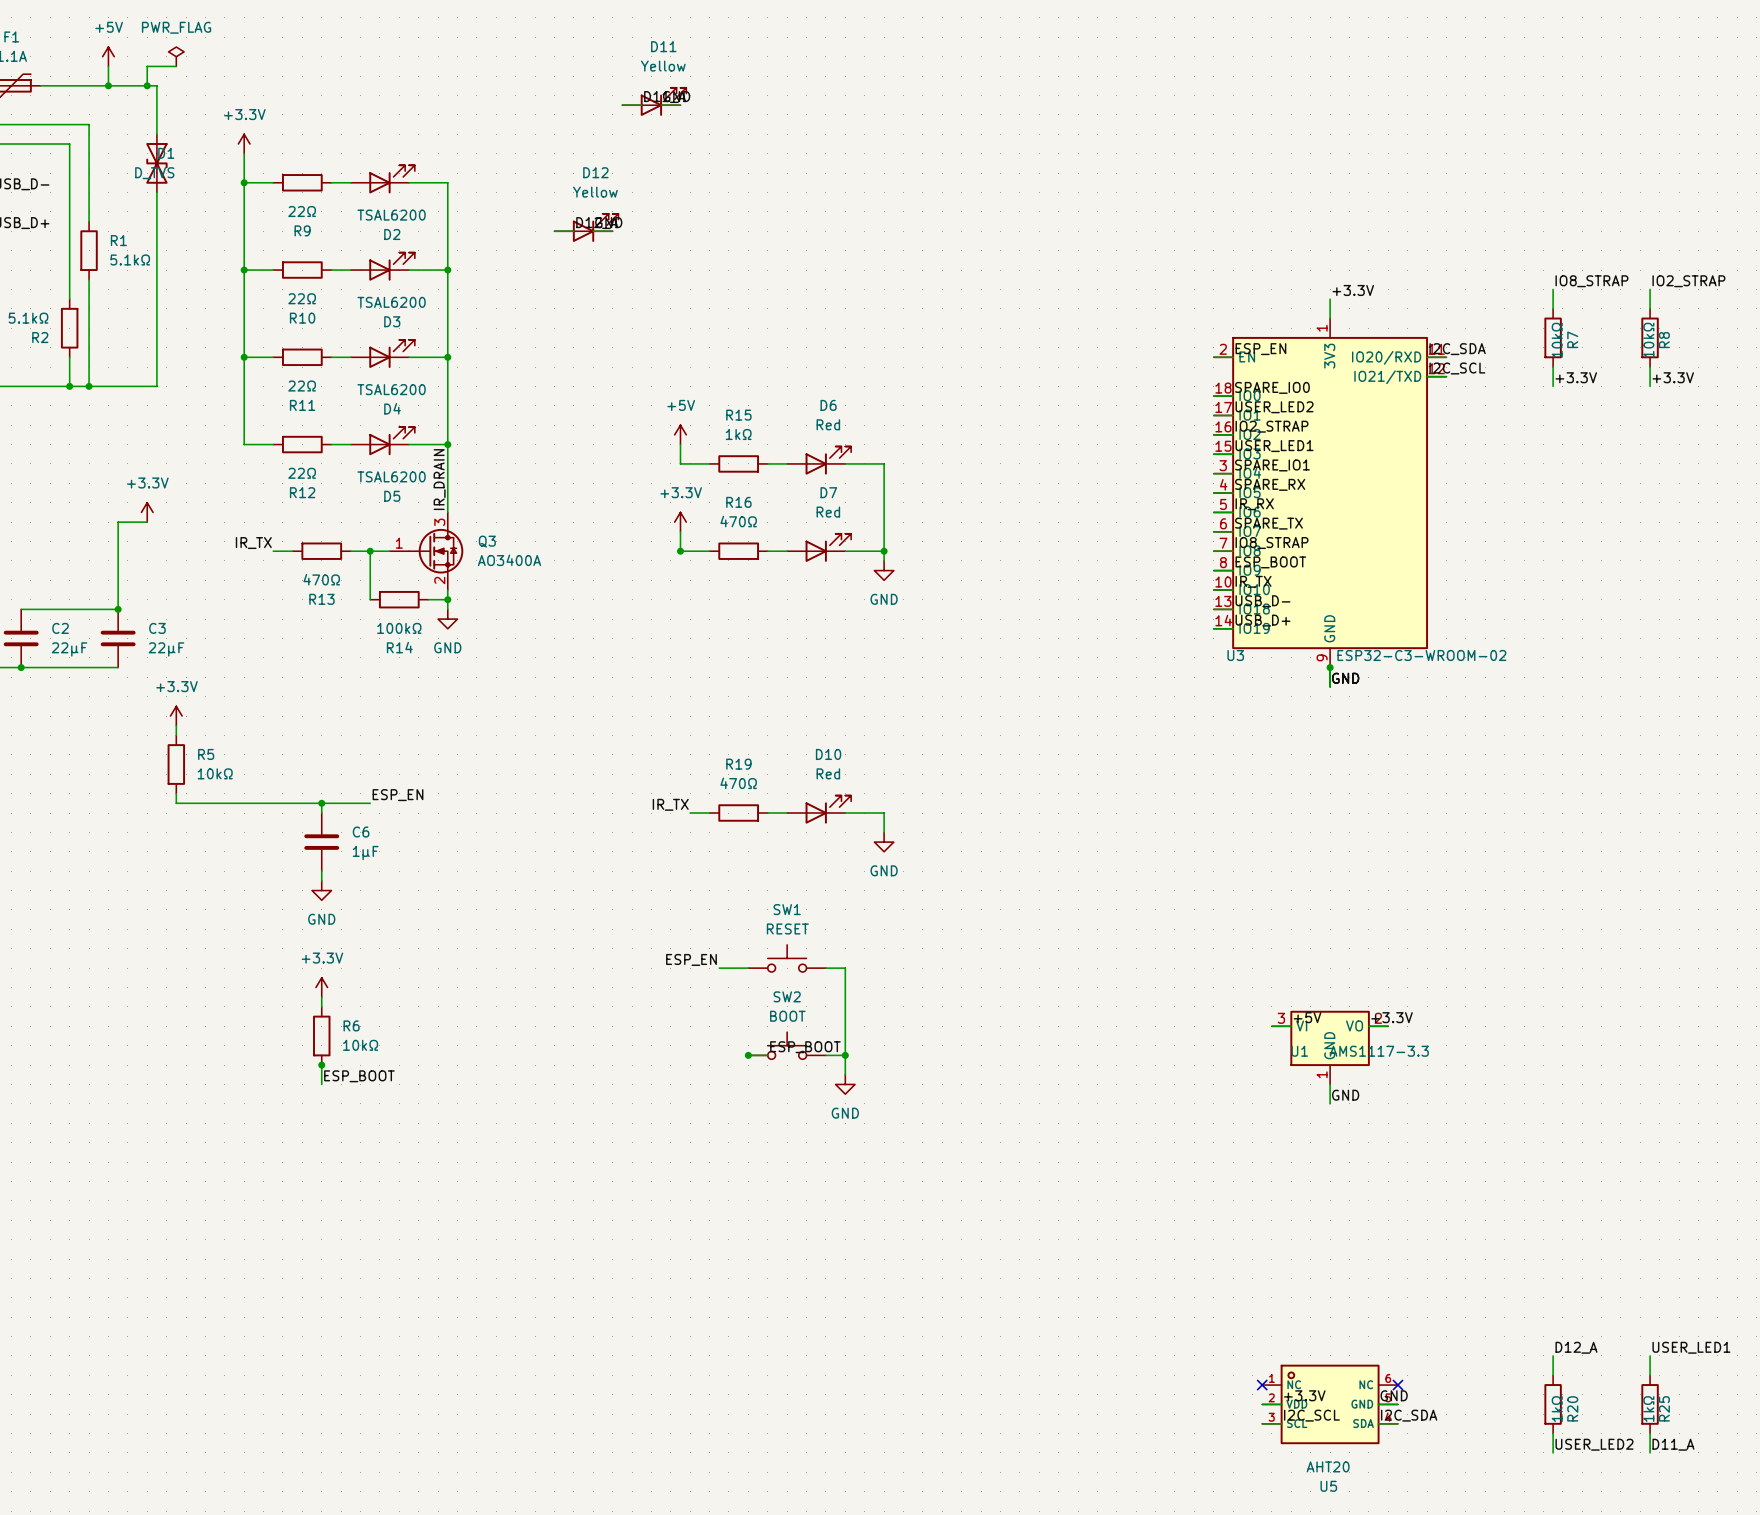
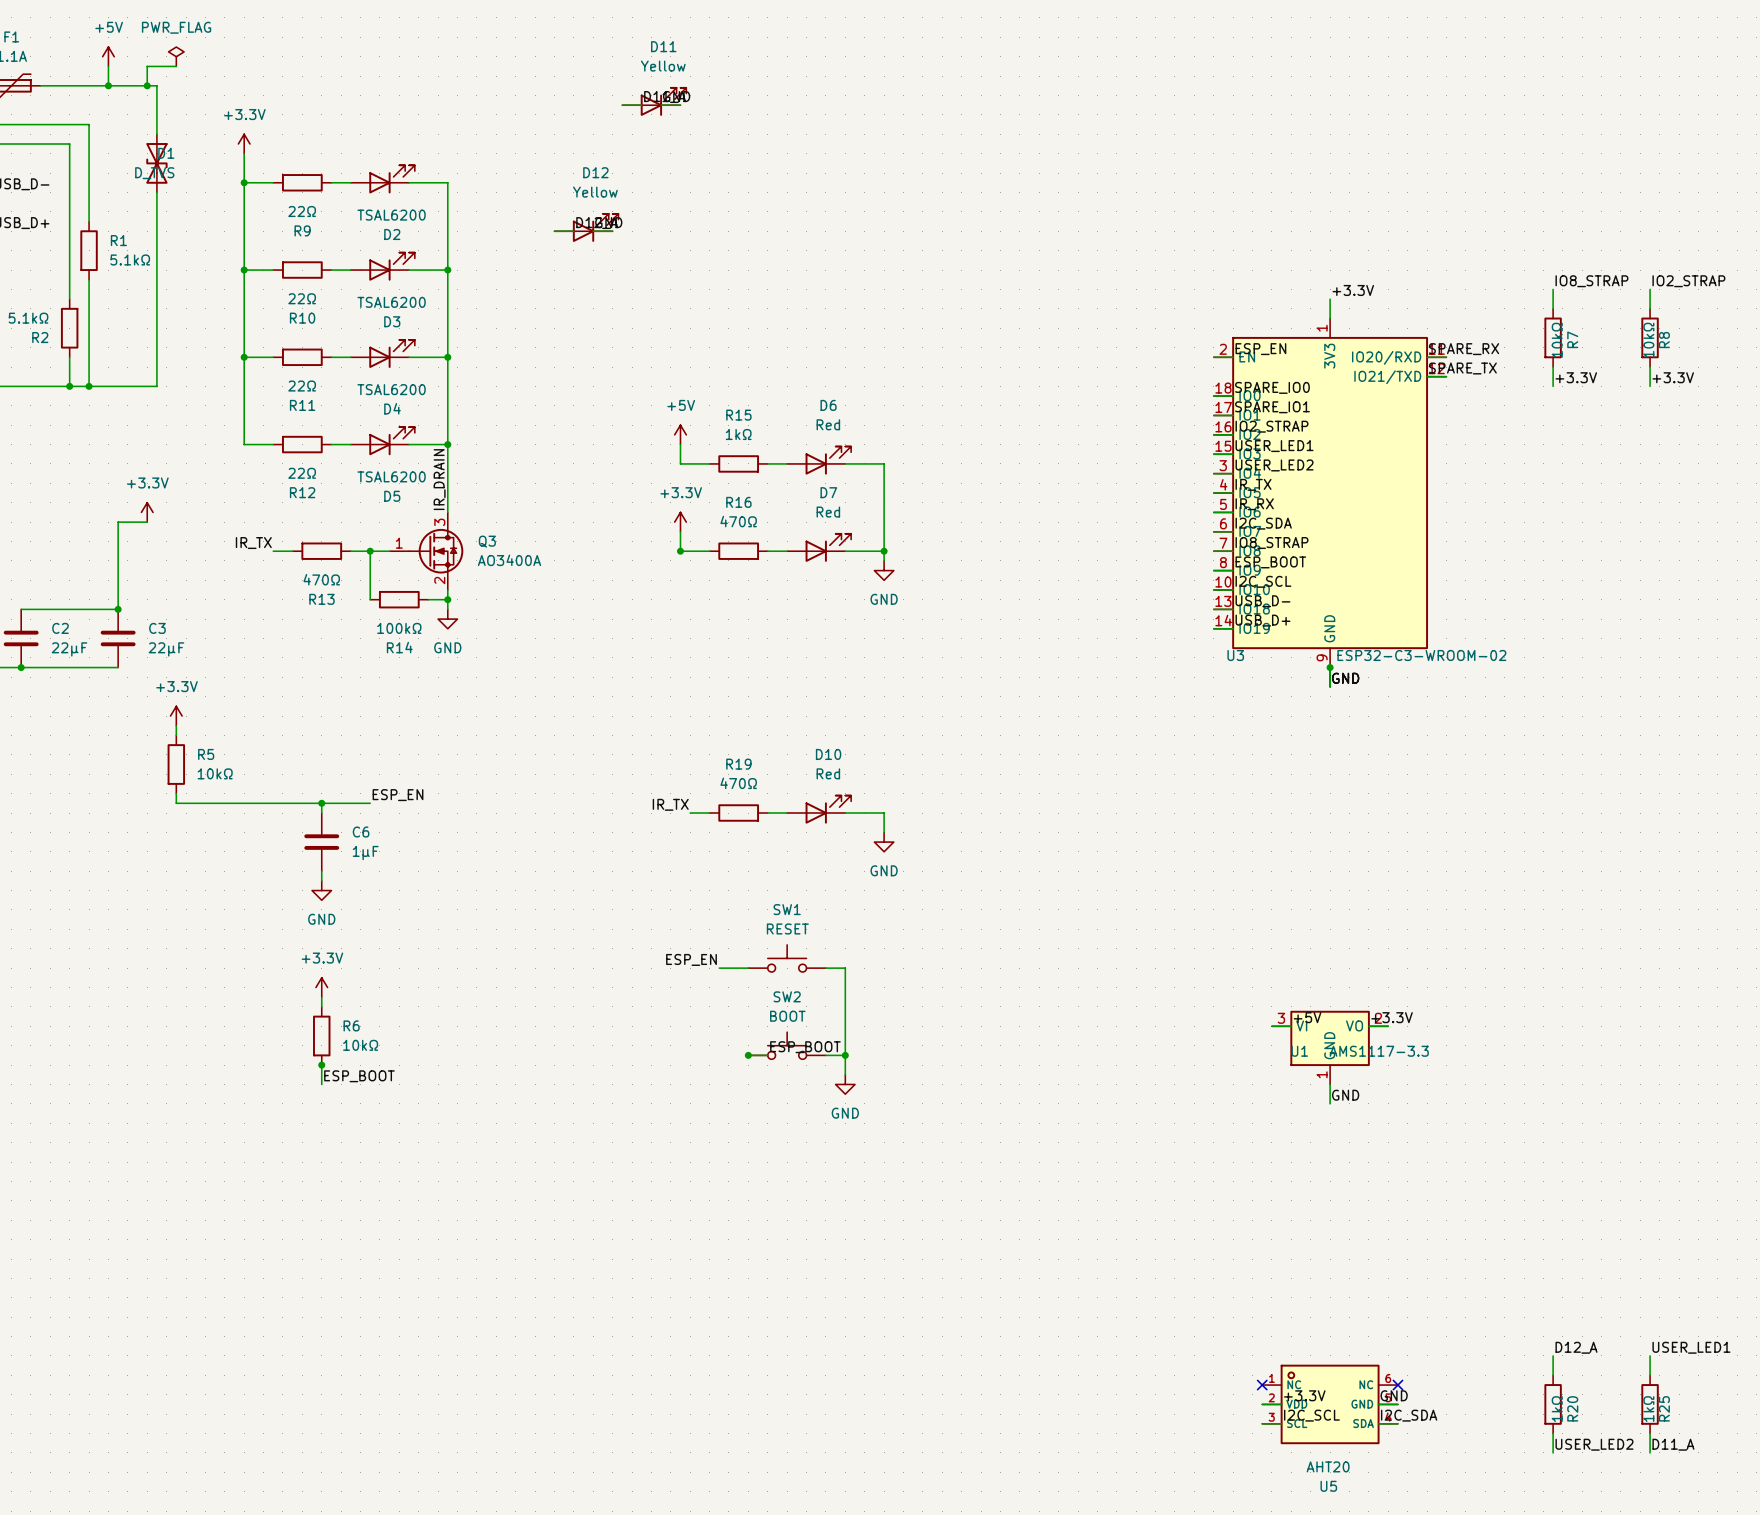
label: I2C_SDA (1457, 349) -> SPARE_RX (1464, 349)
label: I2C_SCL (1457, 368) -> SPARE_TX (1462, 368)
label: USER_LED2 (1274, 407) -> SPARE_IO1 (1272, 407)
label: SPARE_IO1 (1272, 465) -> USER_LED2 (1274, 465)
label: SPARE_RX (1270, 484) -> IR_TX (1253, 484)
label: SPARE_TX (1268, 523) -> I2C_SDA (1263, 523)
label: IR_TX (1253, 581) -> I2C_SCL (1263, 581)

